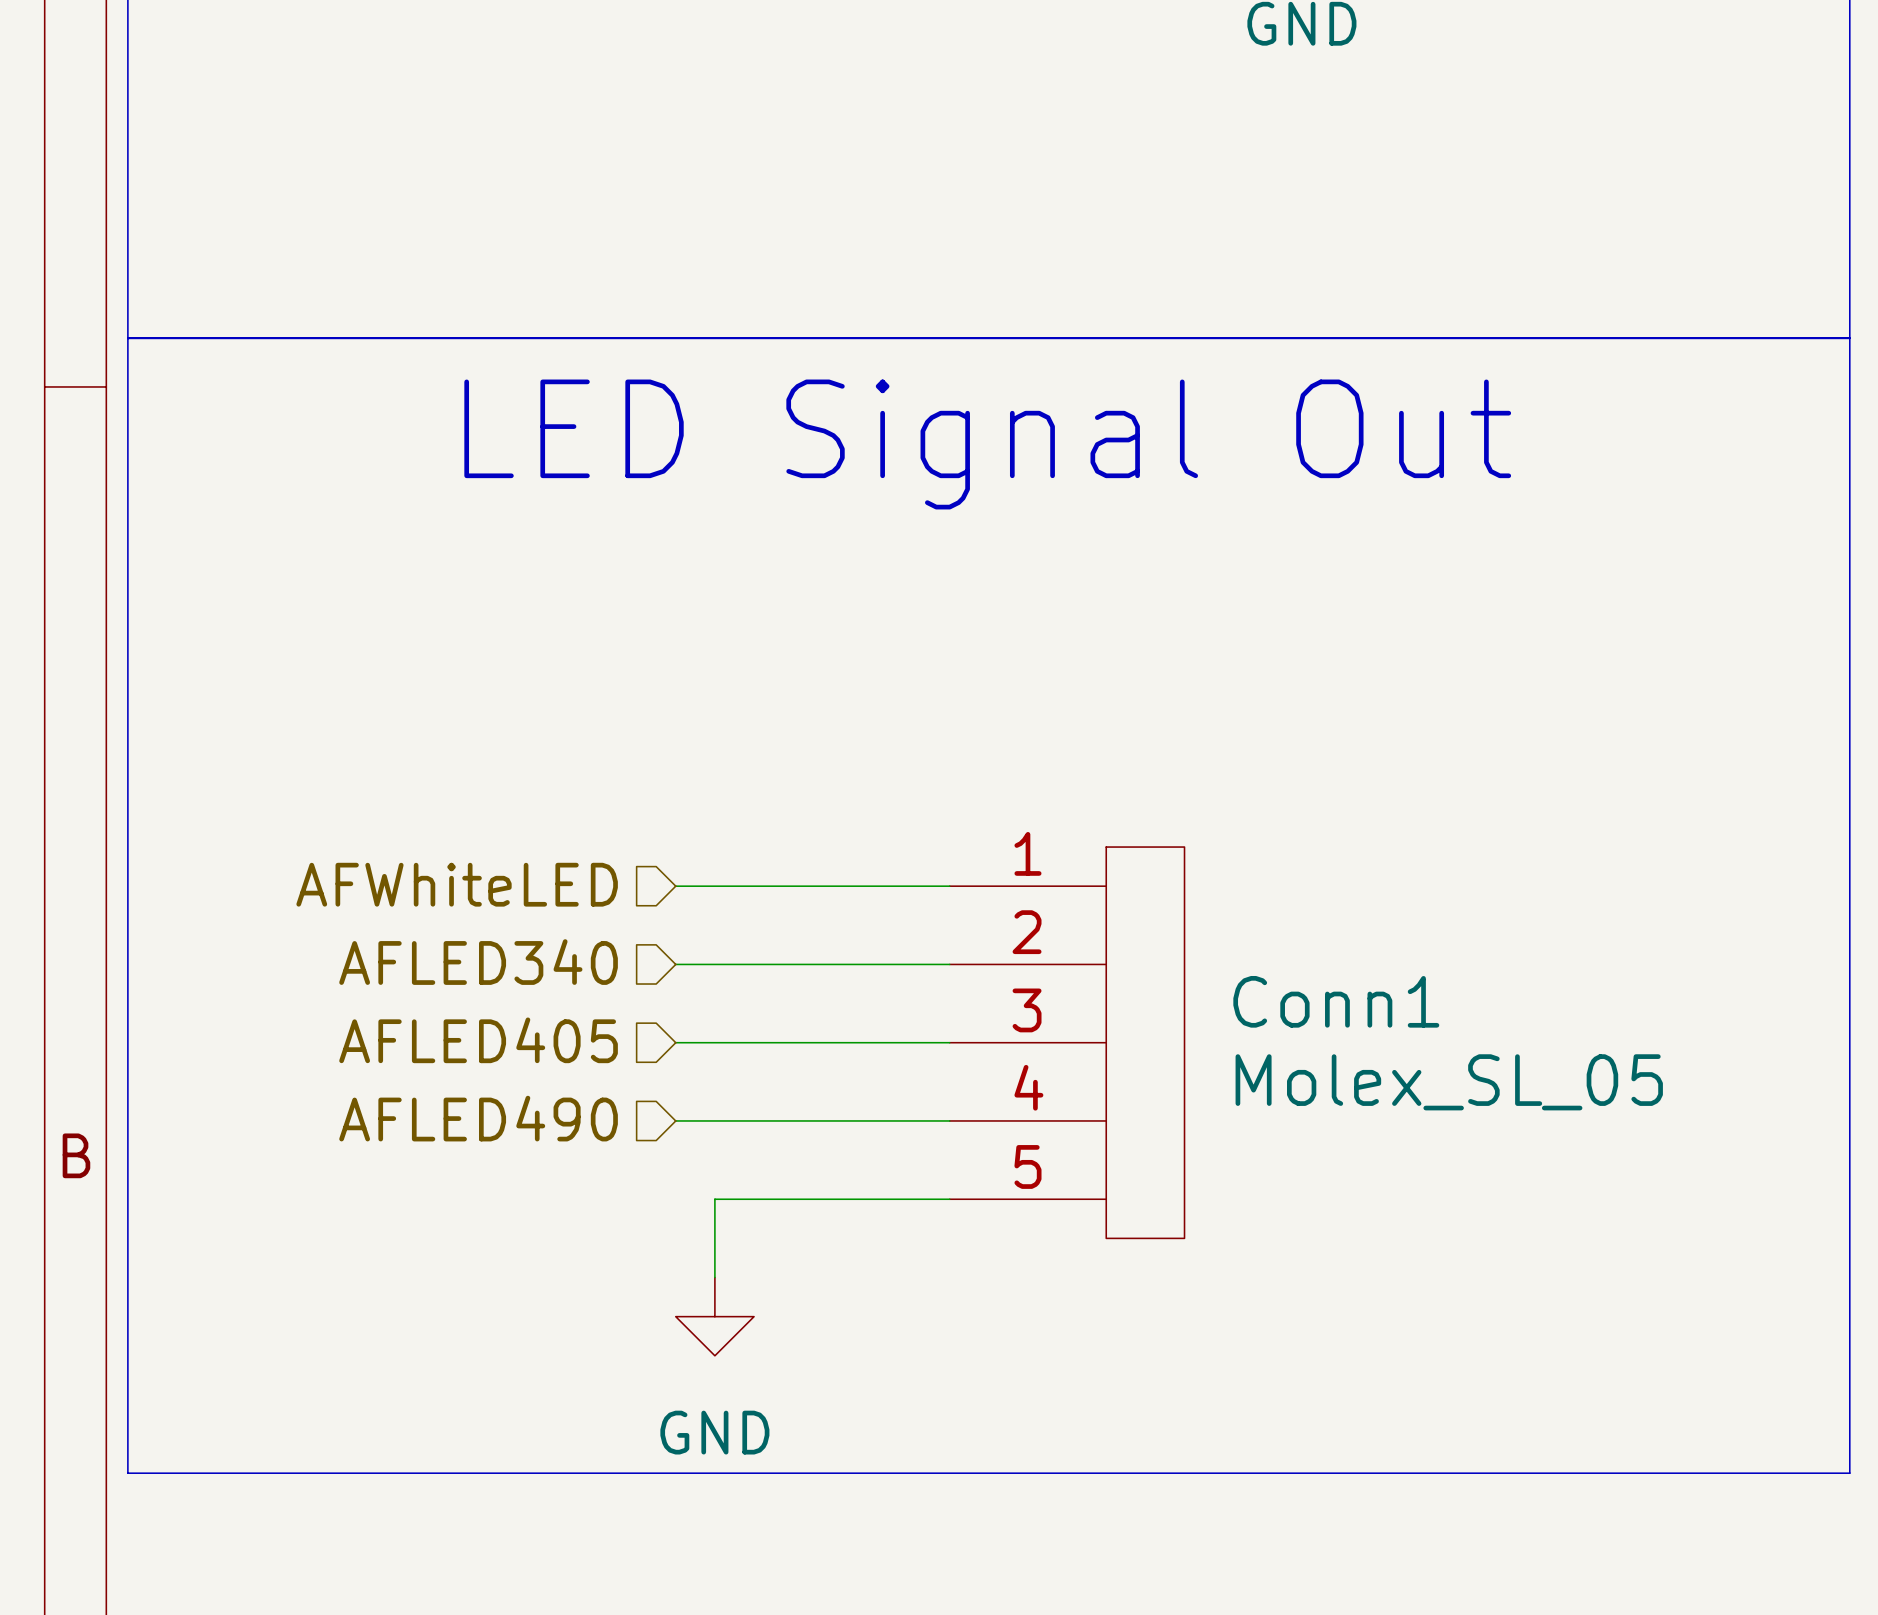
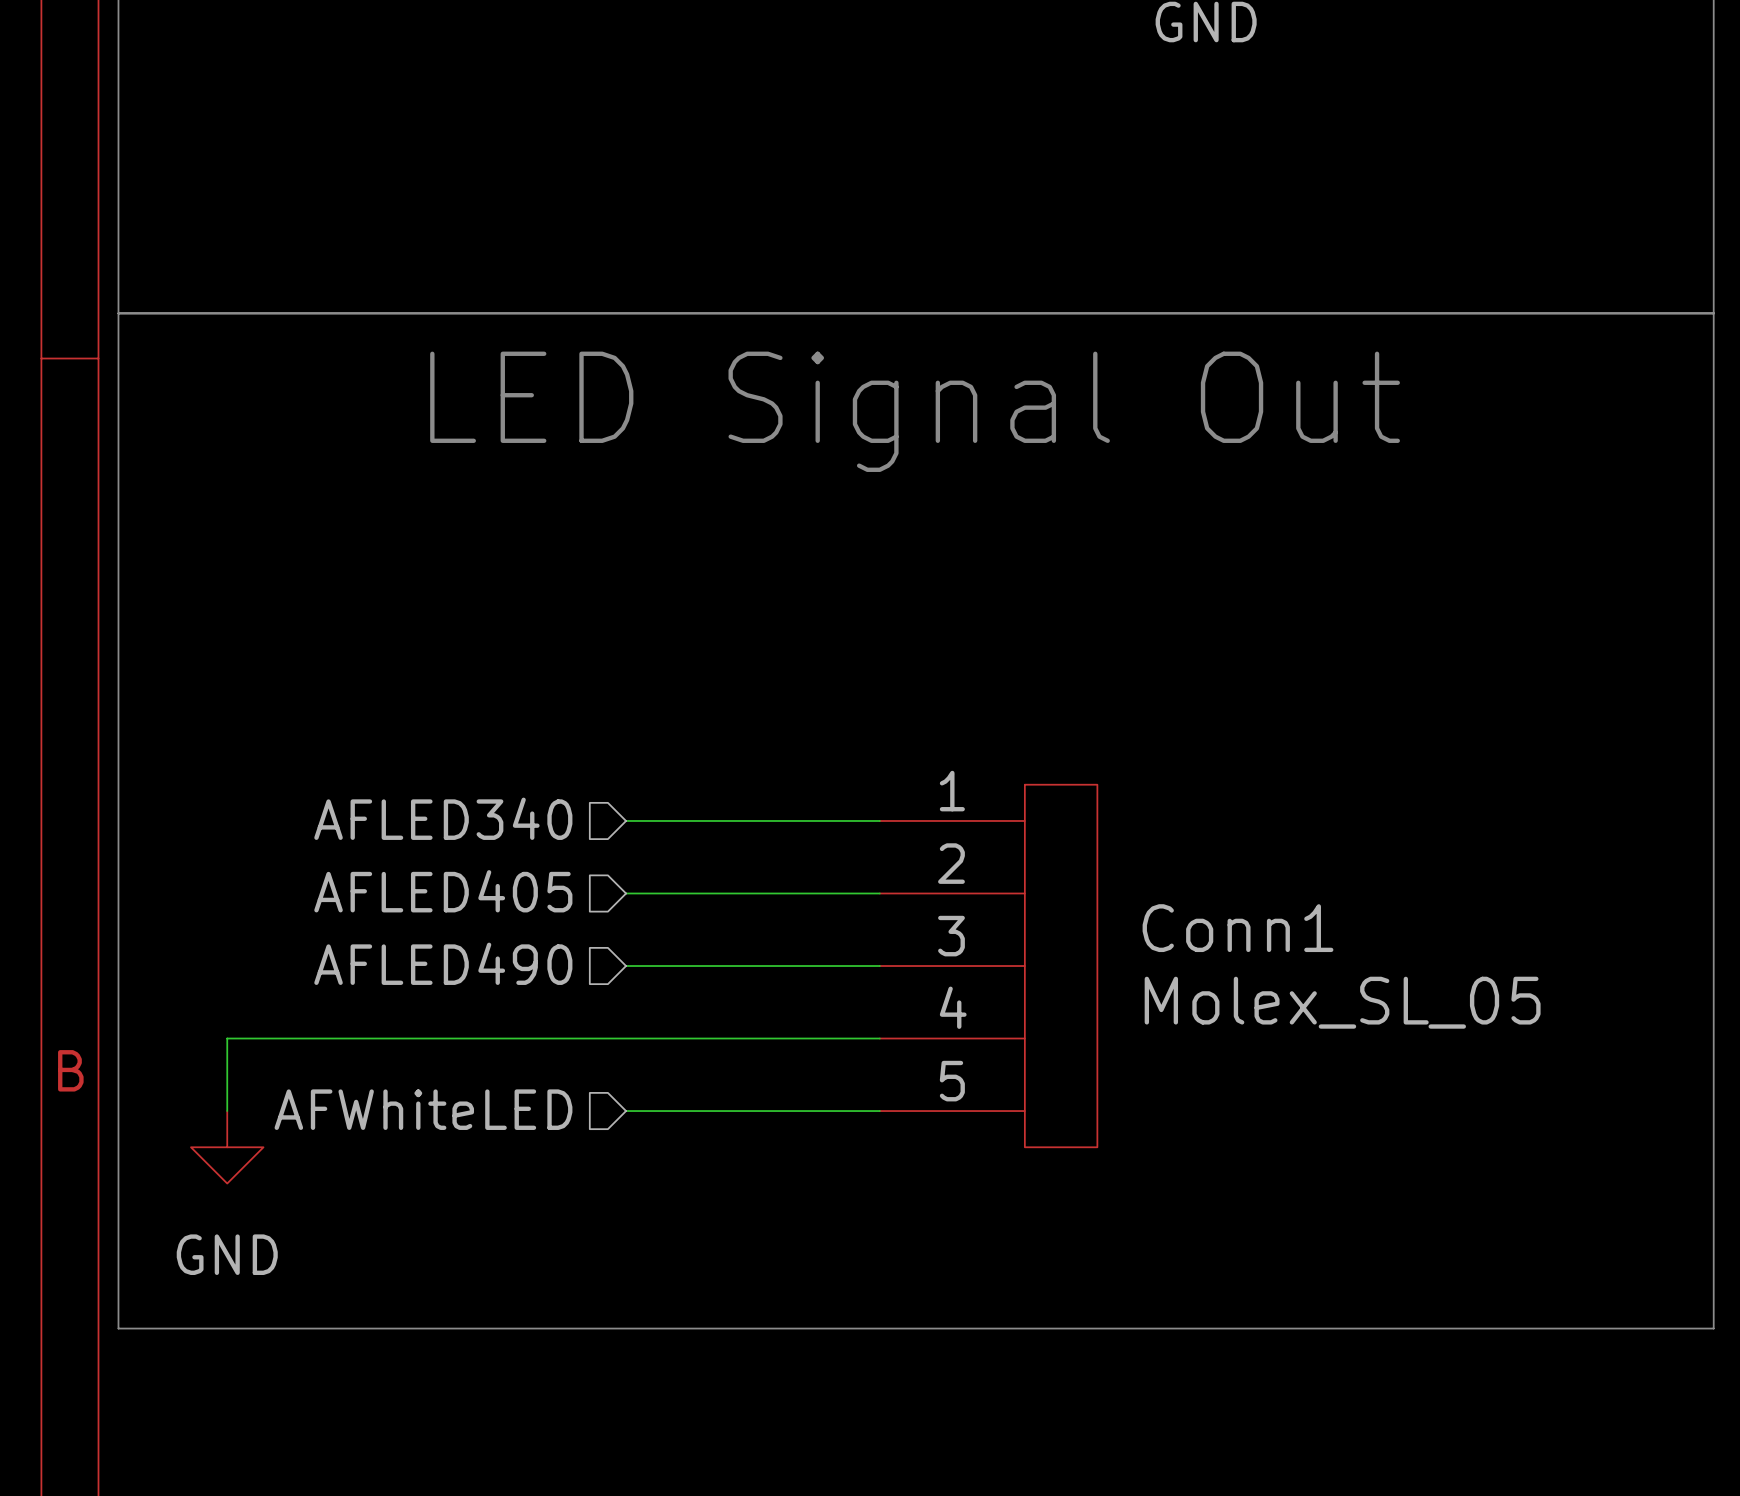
hierarchical label: AFWhiteLED (457, 884) -> AFLED340 (443, 818)
hierarchical label: AFLED340 (478, 962) -> AFLED405 (443, 891)
hierarchical label: AFLED405 (478, 1040) -> AFLED490 (443, 963)
hierarchical label: AFLED490 (478, 1118) -> none
wire: none -> (626, 1038) (227, 1038) (227, 1111)
hierarchical label: none -> AFWhiteLED (423, 1109)
wire: (714, 1199) (714, 1277) -> (662, 1111) (626, 1111)
power symbol position: GND (714, 1316) -> GND (227, 1147)
line: (127, 1434) (127, 1473) (1849, 1473) (1849, 1434) -> (118, 1328) (1713, 1328)

